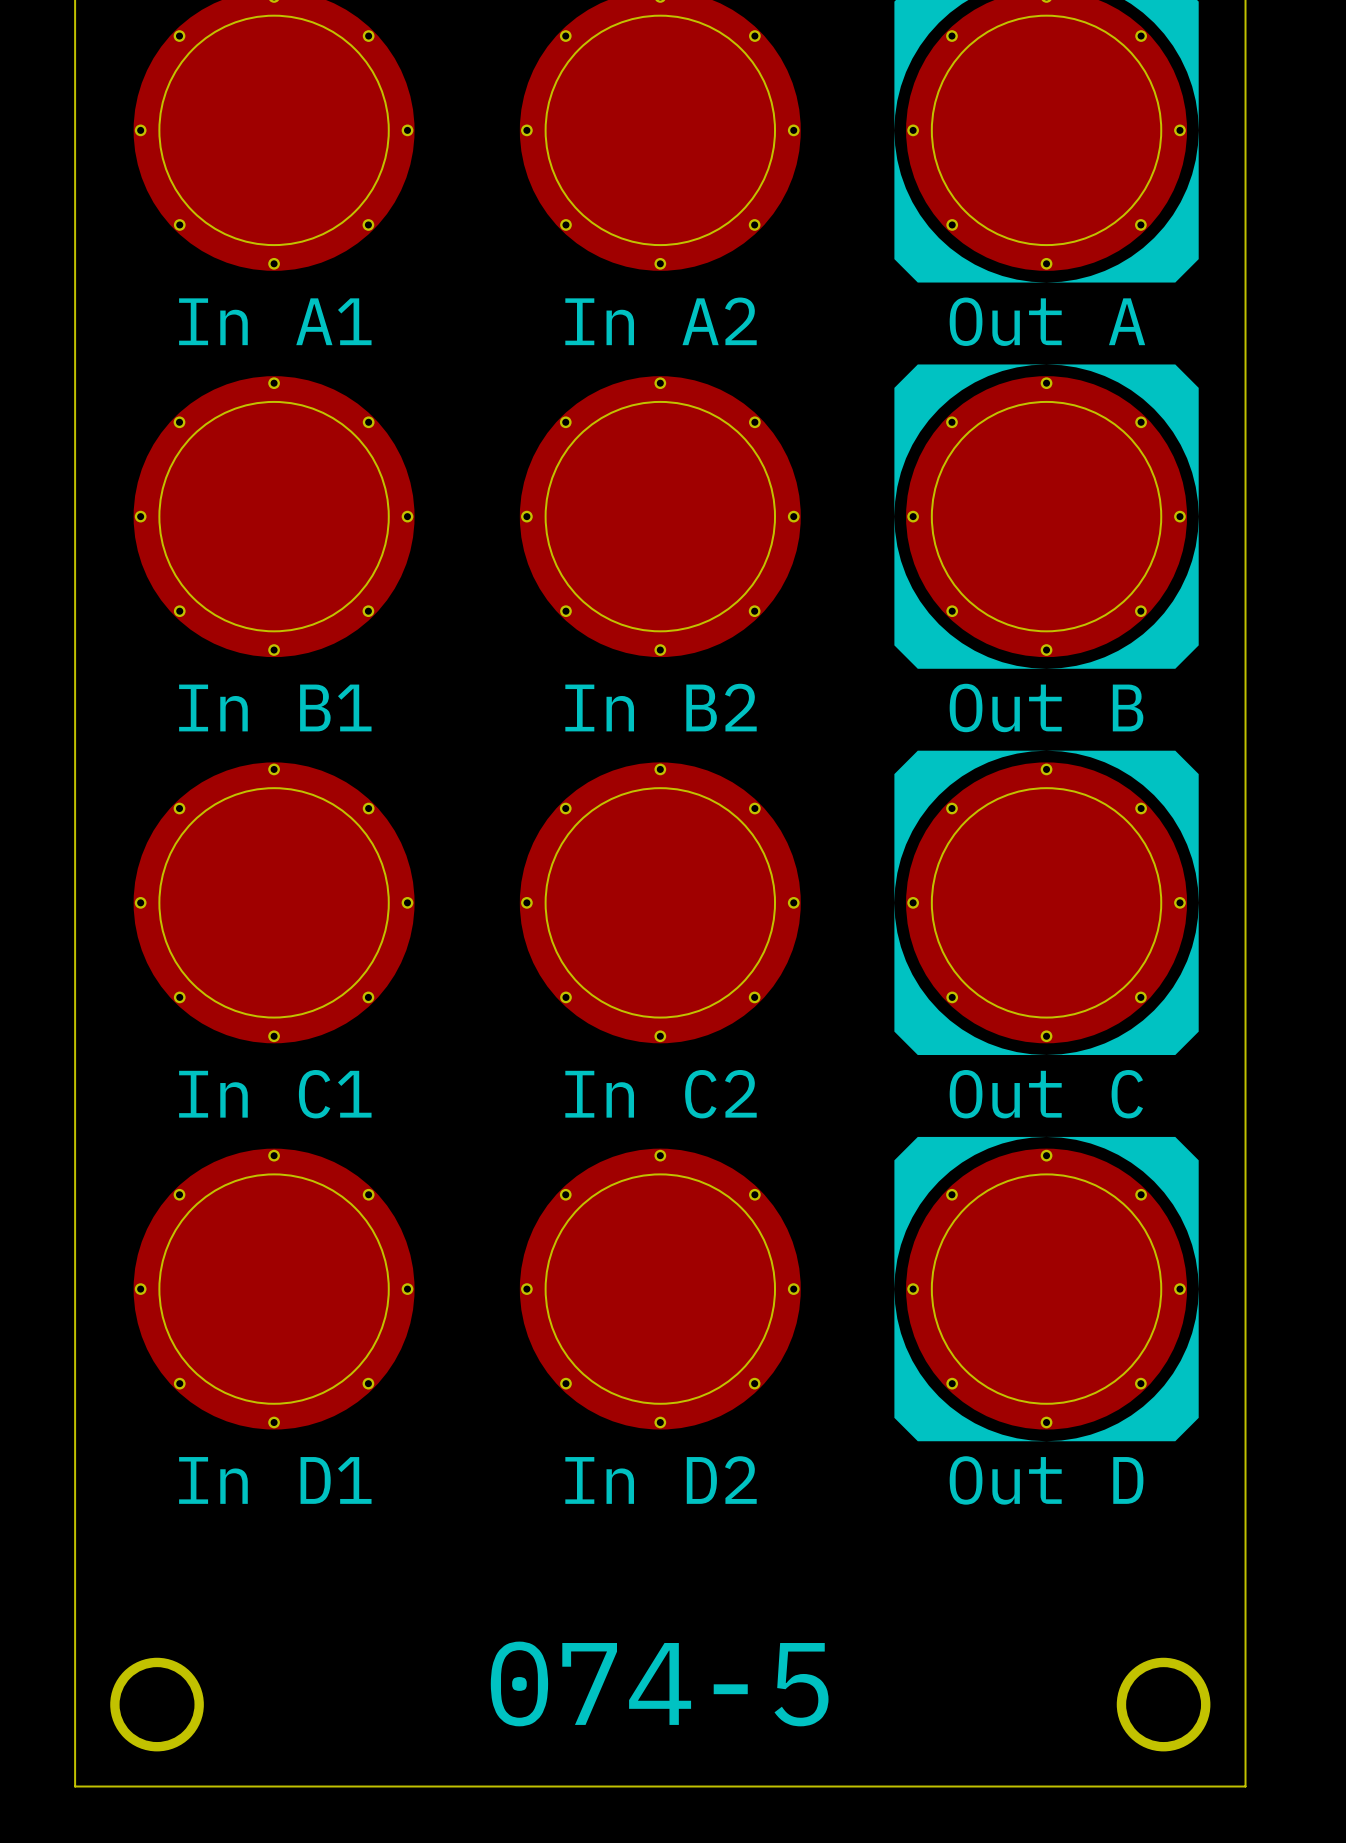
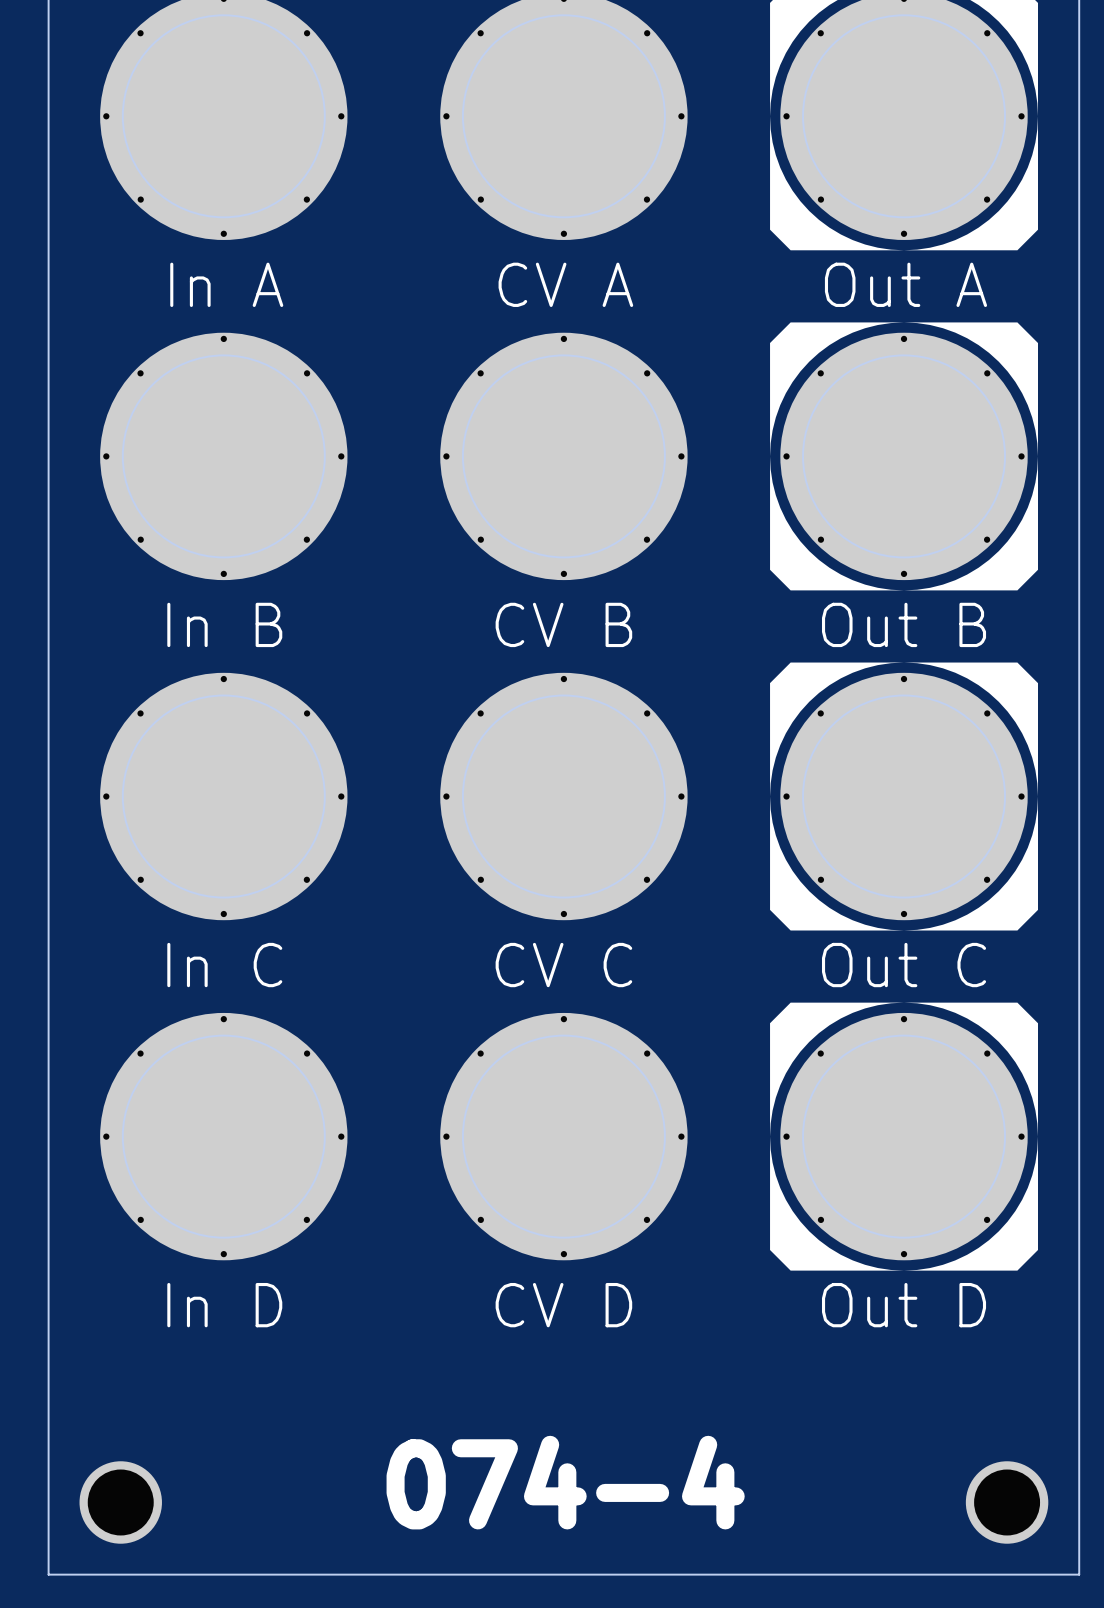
part value: In A1 (275, 321) -> In A (226, 284)
part value: In A2 (661, 321) -> CV A (565, 284)
part value: In B1 (275, 707) -> In B (224, 624)
part value: In B2 (661, 707) -> CV B (563, 624)
part value: In C1 (275, 1094) -> In C (224, 965)
part value: In C2 (661, 1094) -> CV C (563, 965)
part value: In D1 (275, 1480) -> In D (224, 1305)
part value: In D2 (661, 1480) -> CV D (563, 1305)
text: 074-5 (659, 1683) -> 074-4 (565, 1482)

